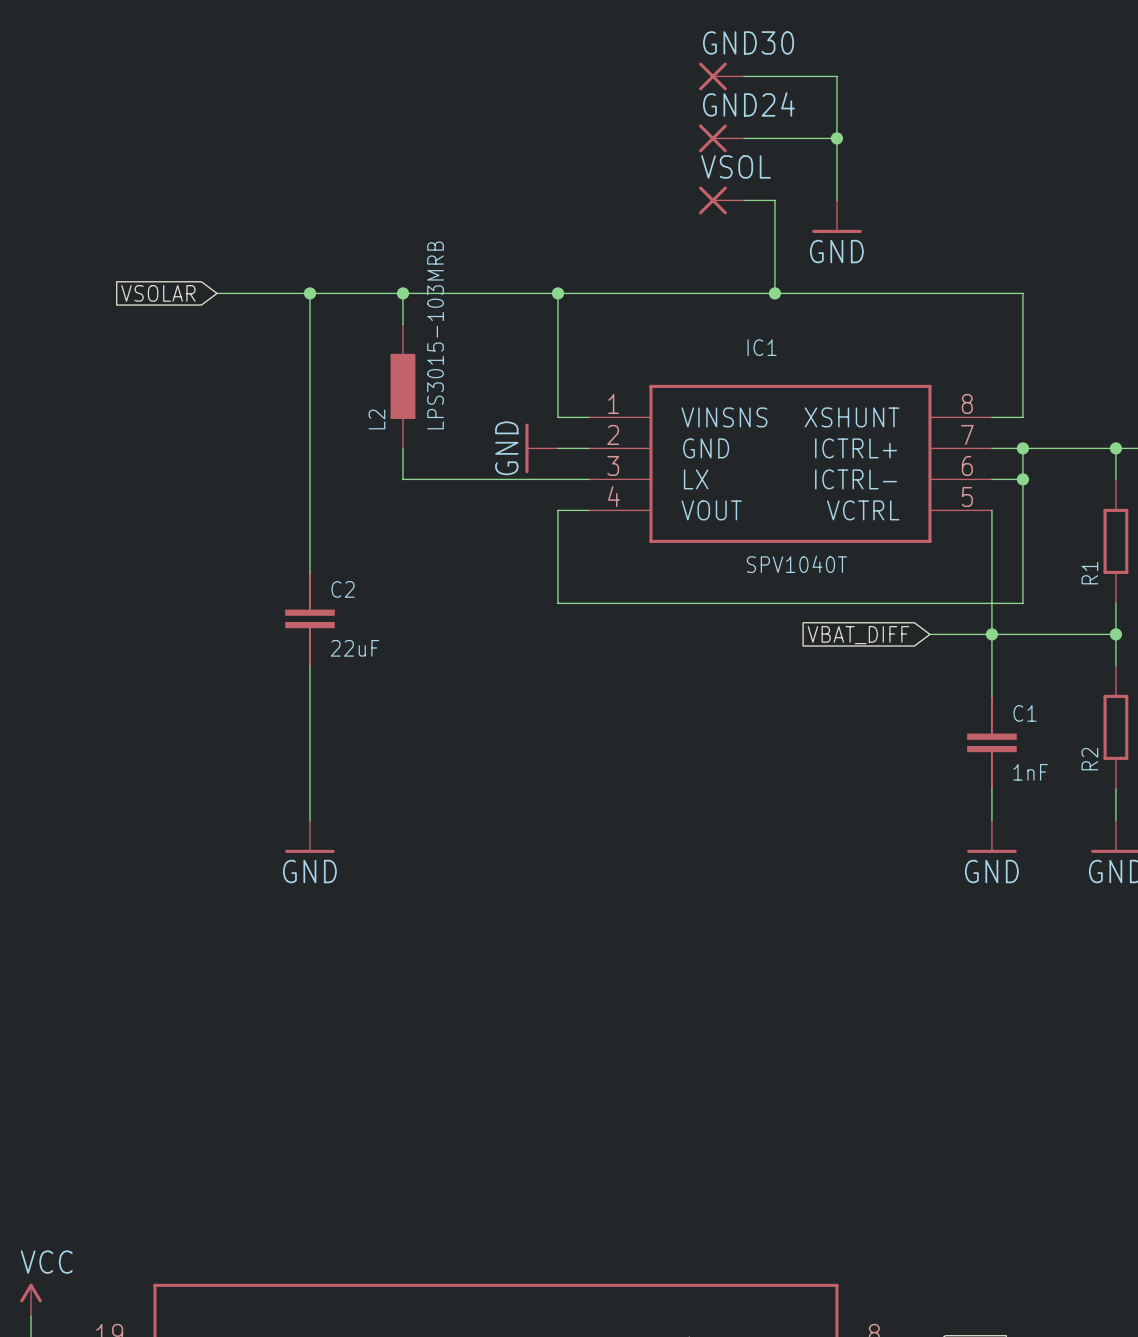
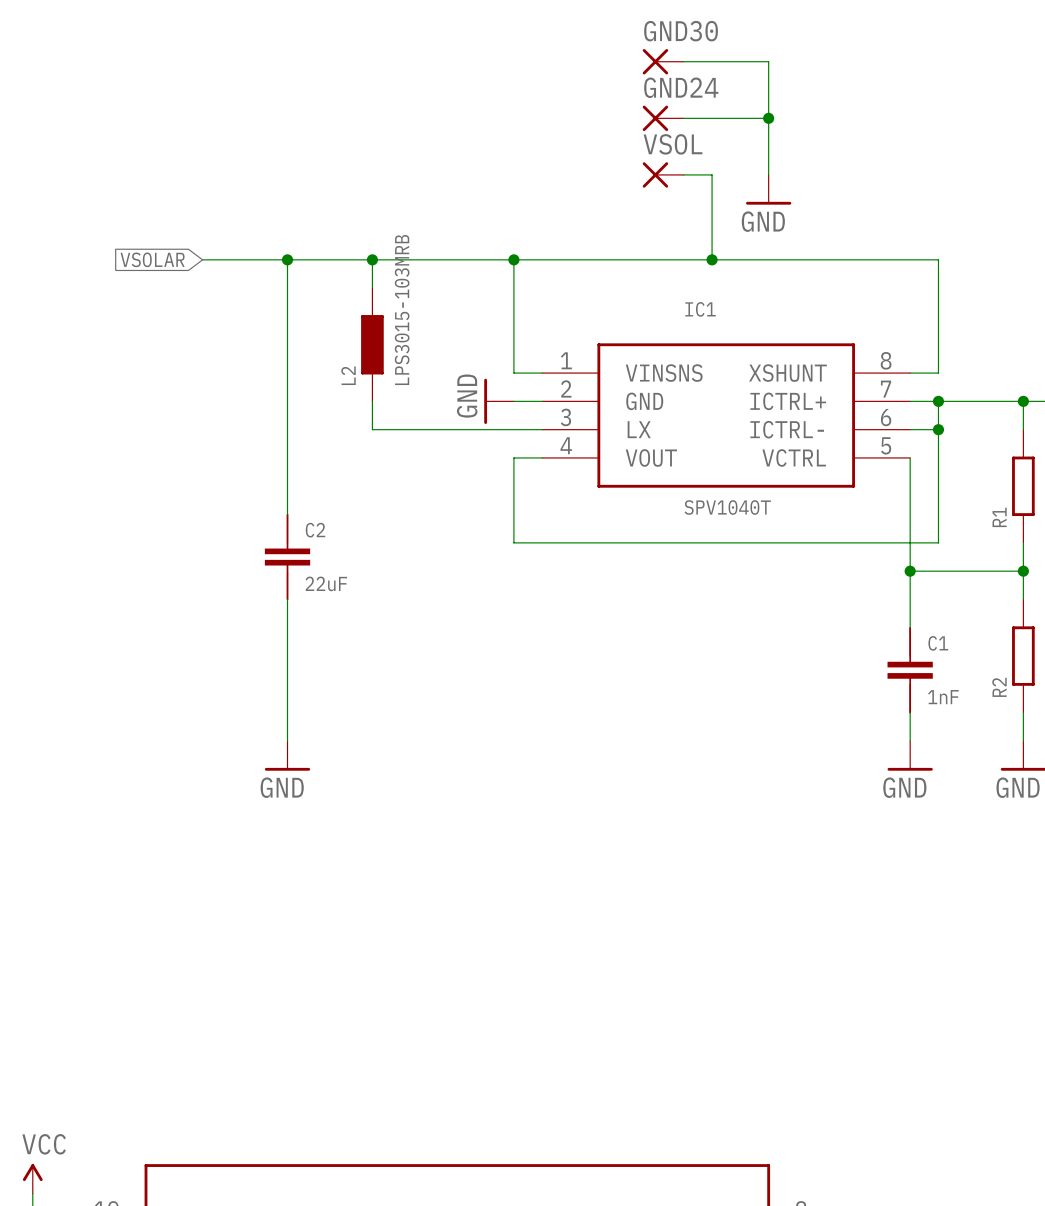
wire: (929, 634) (991, 634) -> none
global label: VBAT_DIFF (858, 635) -> none

